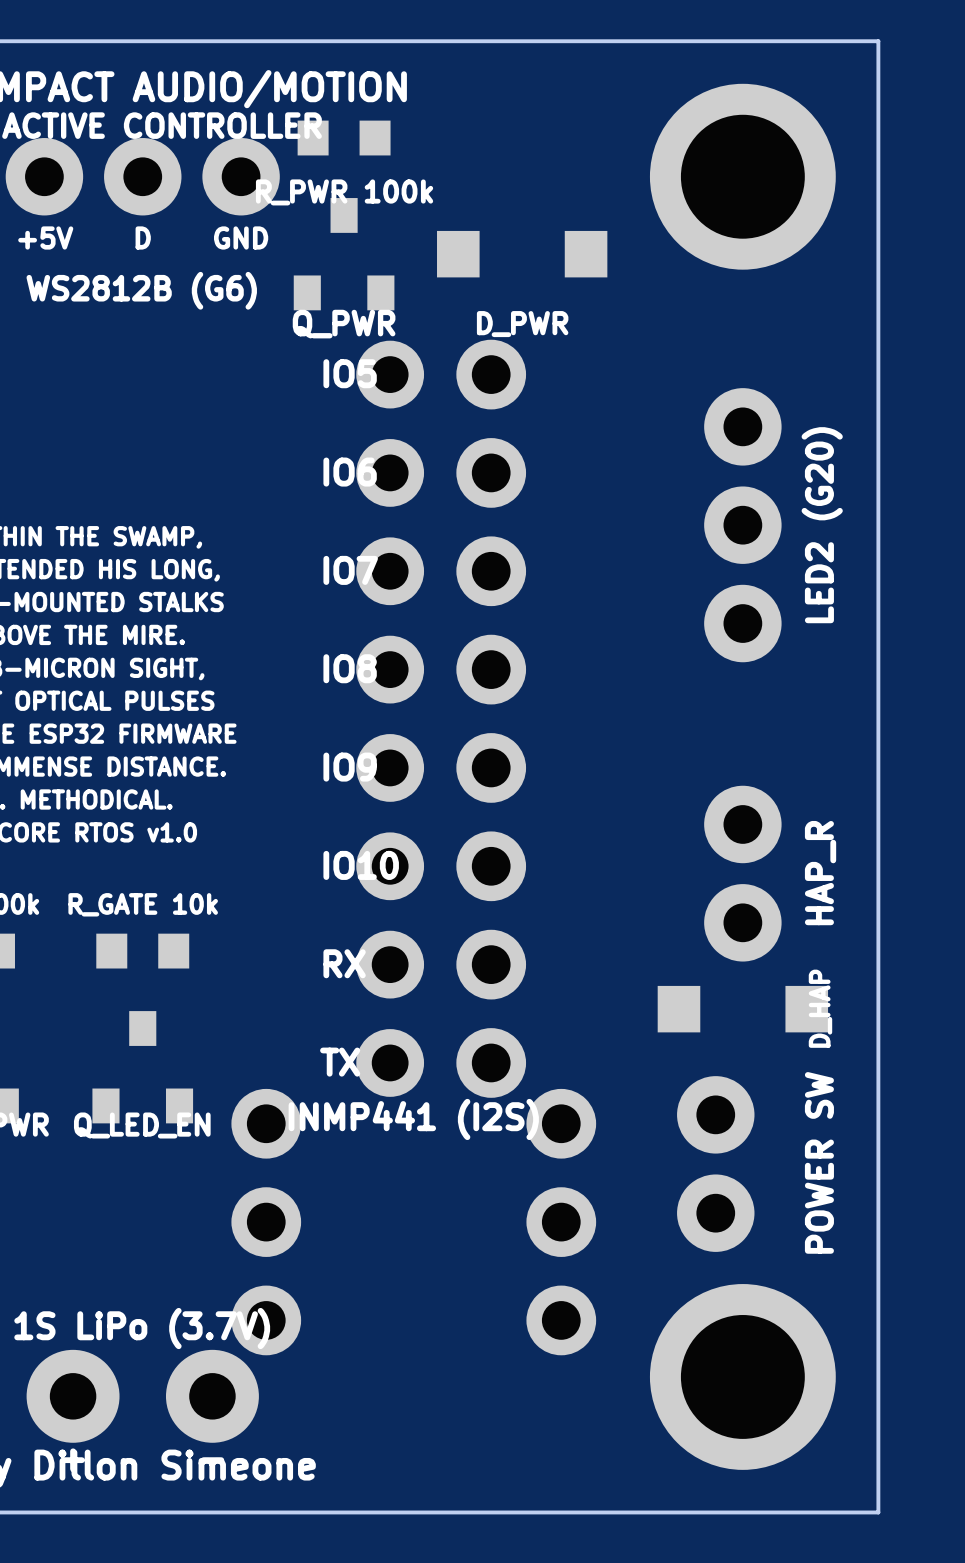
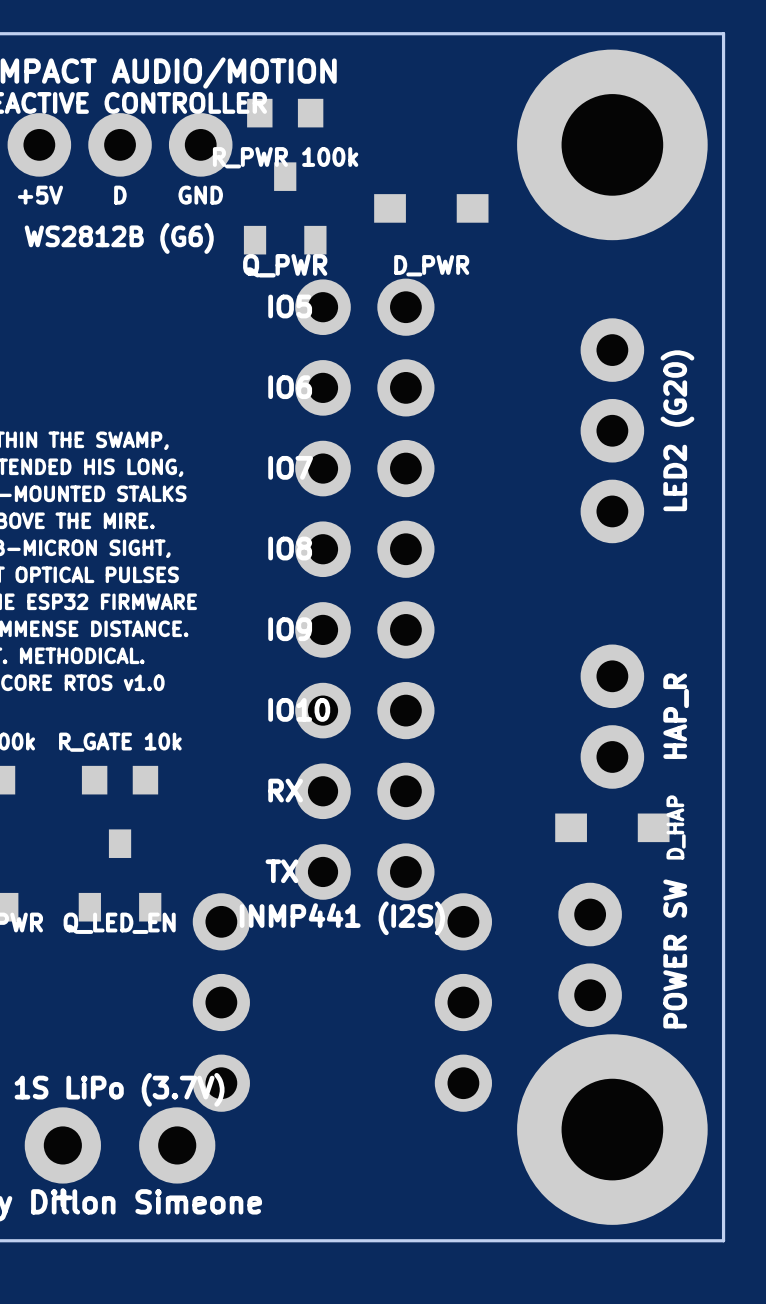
part footprint: [649, 83, 836, 270] -> [517, 49, 708, 241]
part footprint: [437, 230, 608, 278] -> [374, 194, 489, 223]
part footprint: [657, 985, 829, 1033] -> [555, 813, 670, 843]
part footprint: [649, 1284, 836, 1470] -> [517, 1034, 708, 1225]

